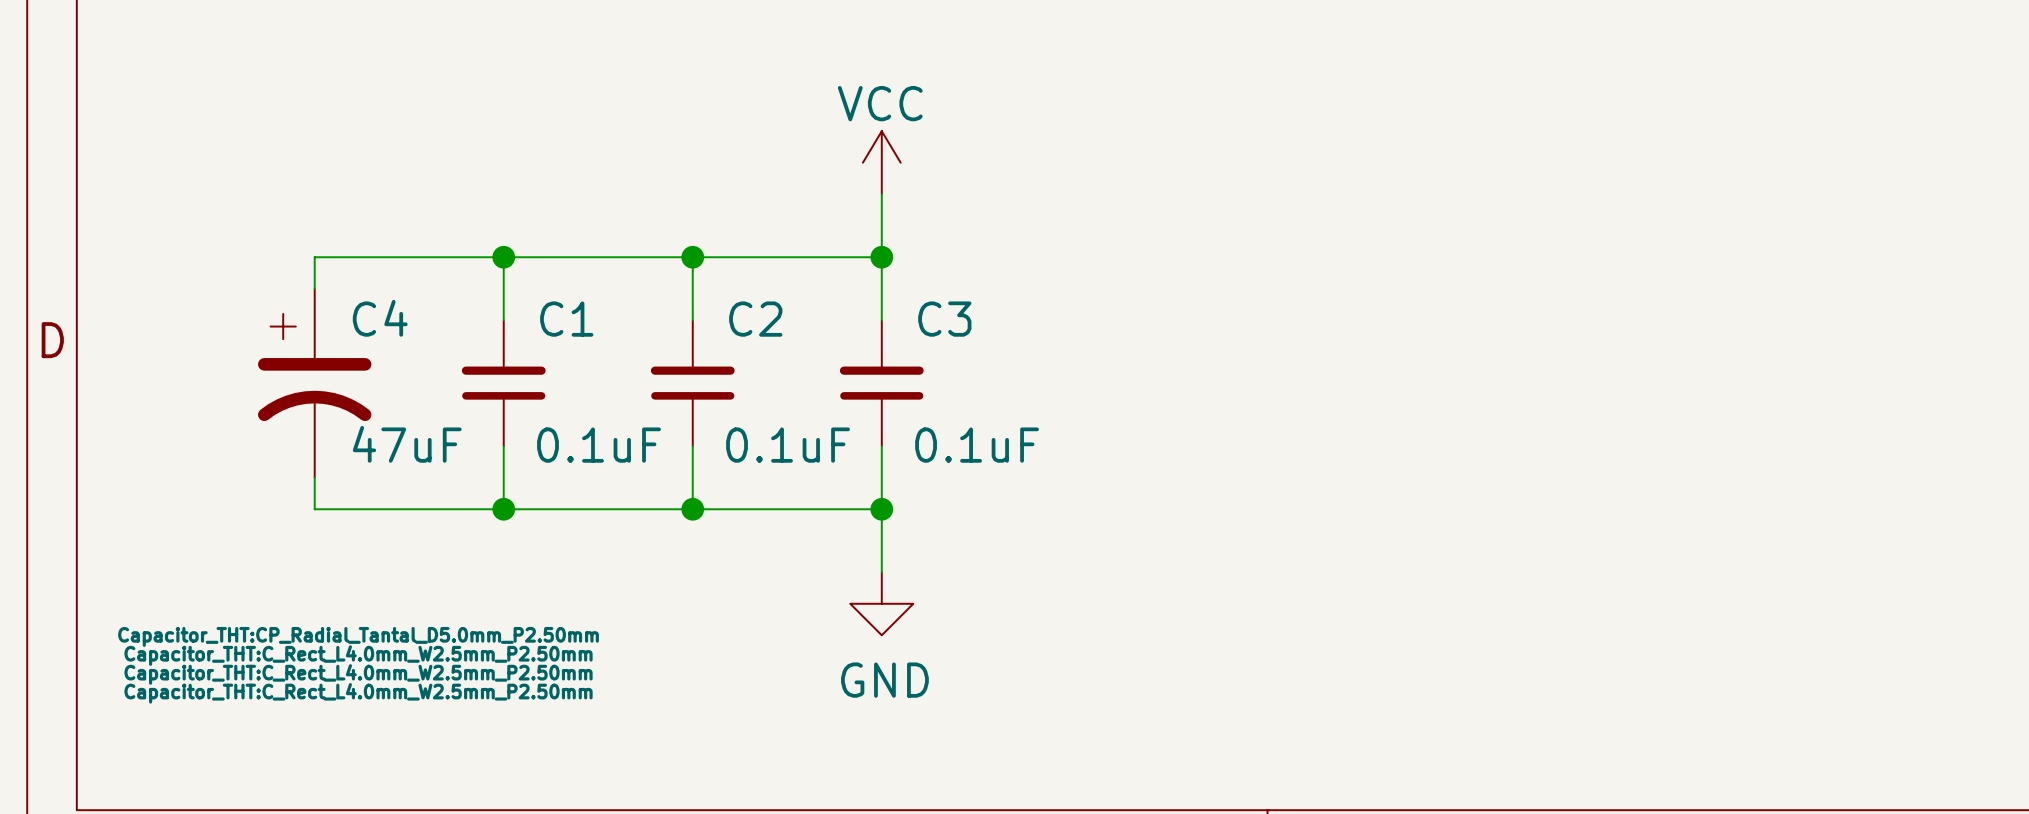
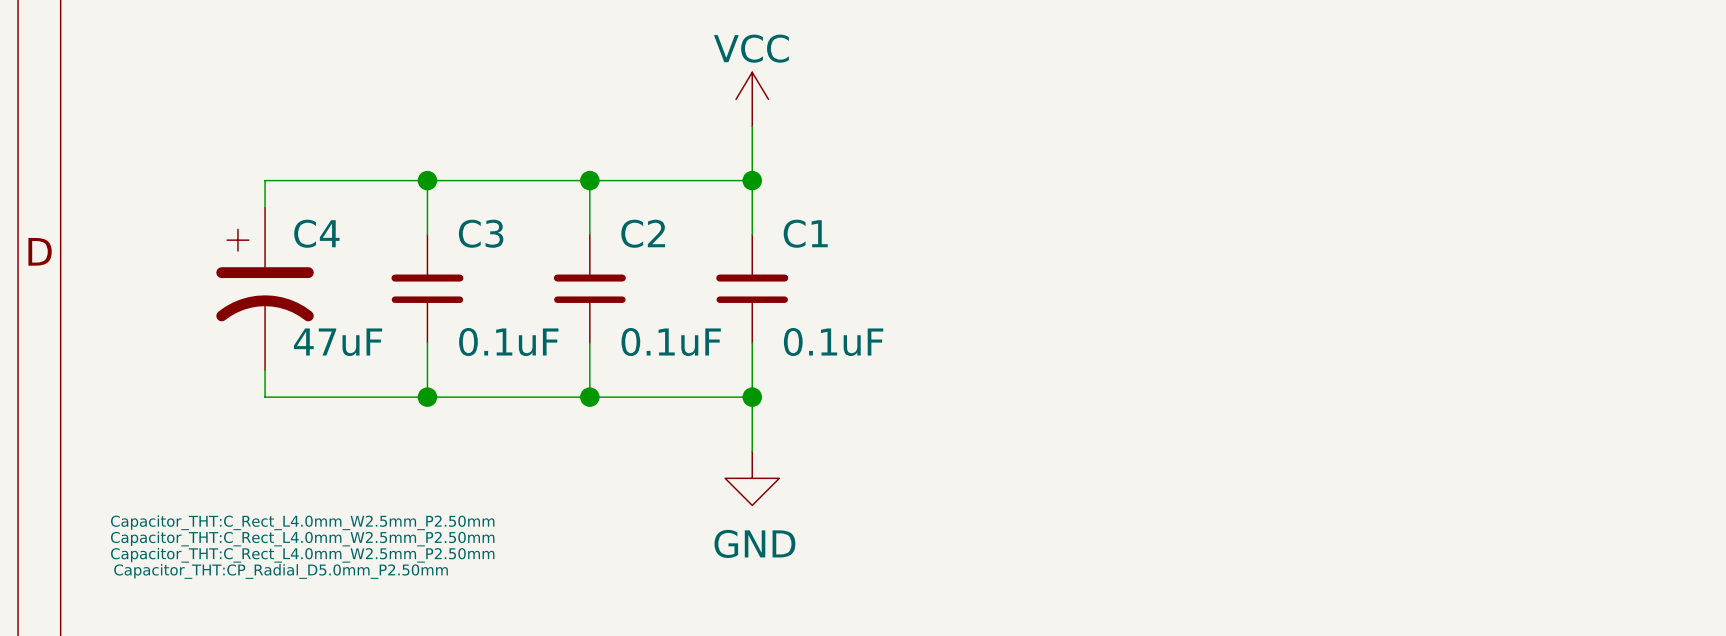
C1 name: C1 (566, 319) -> C3 (481, 233)
C3 name: C3 (944, 319) -> C1 (805, 233)
C4 text: Capacitor_THT:CP_Radial_Tantal_D5.0mm_P2.50mm (358, 636) -> Capacitor_THT:CP_Radial_D5.0mm_P2.50mm (281, 571)

